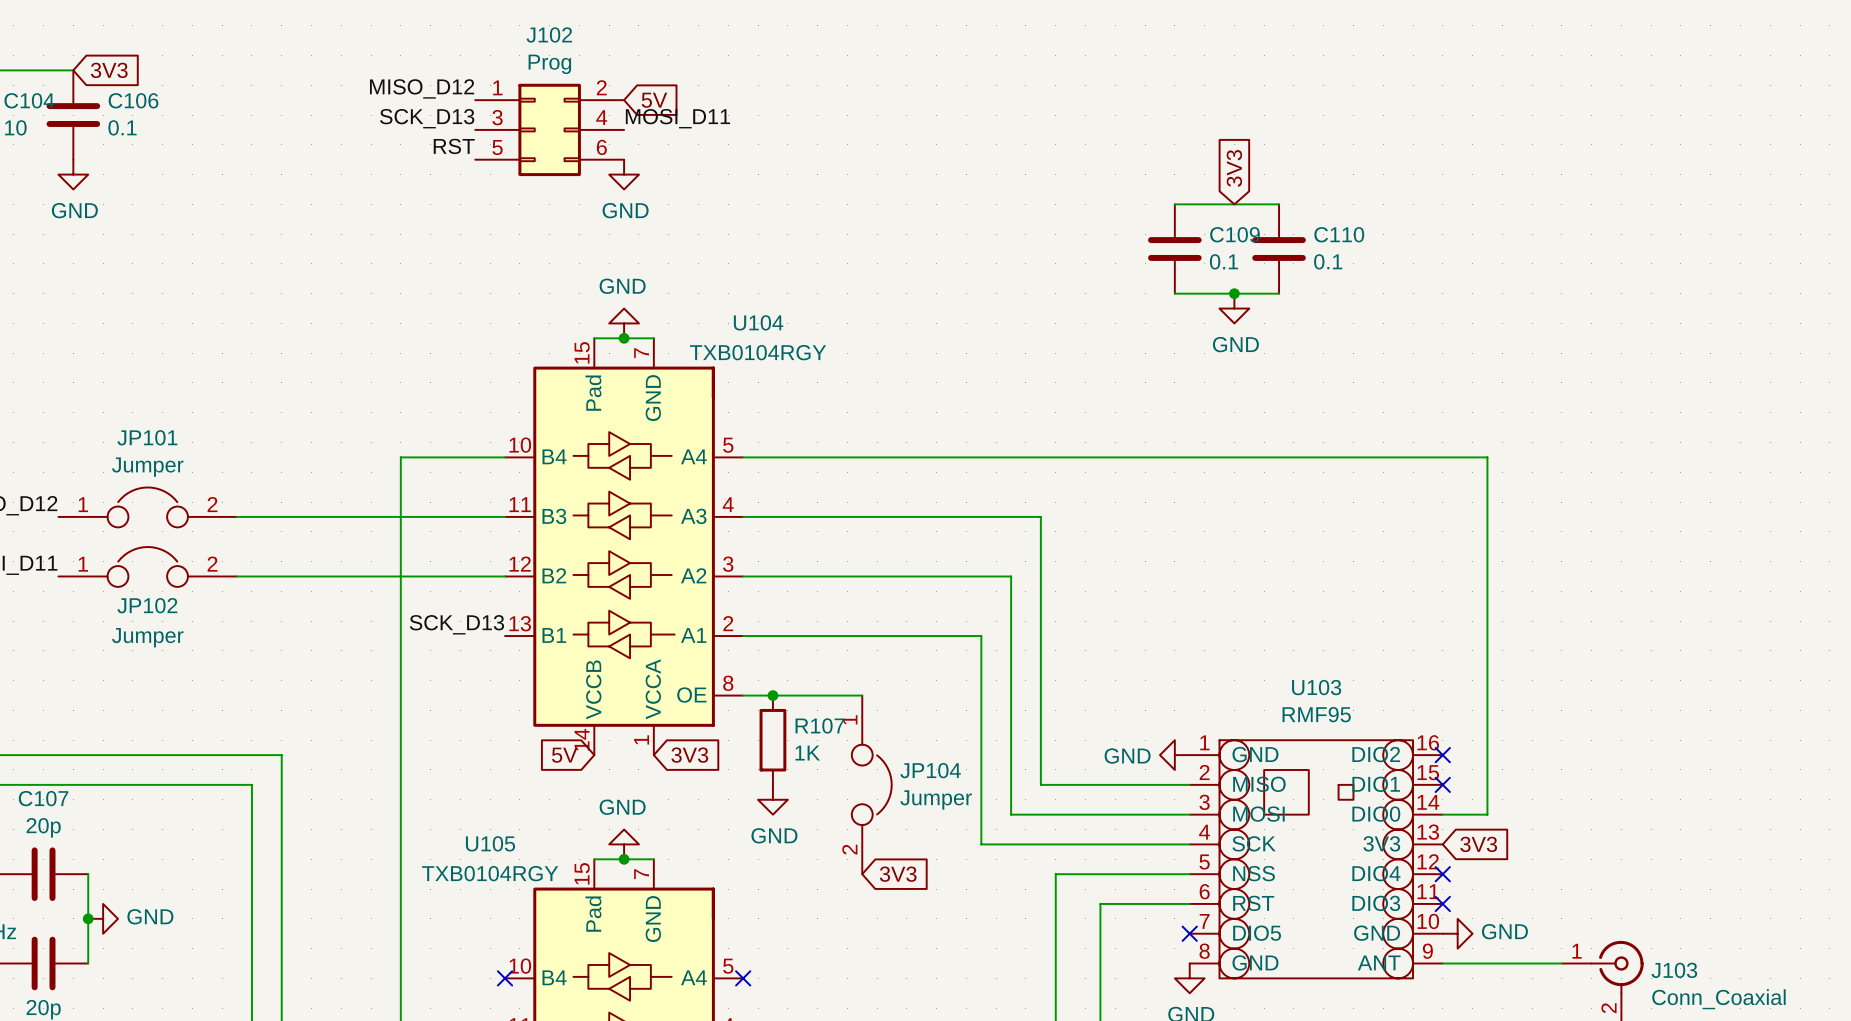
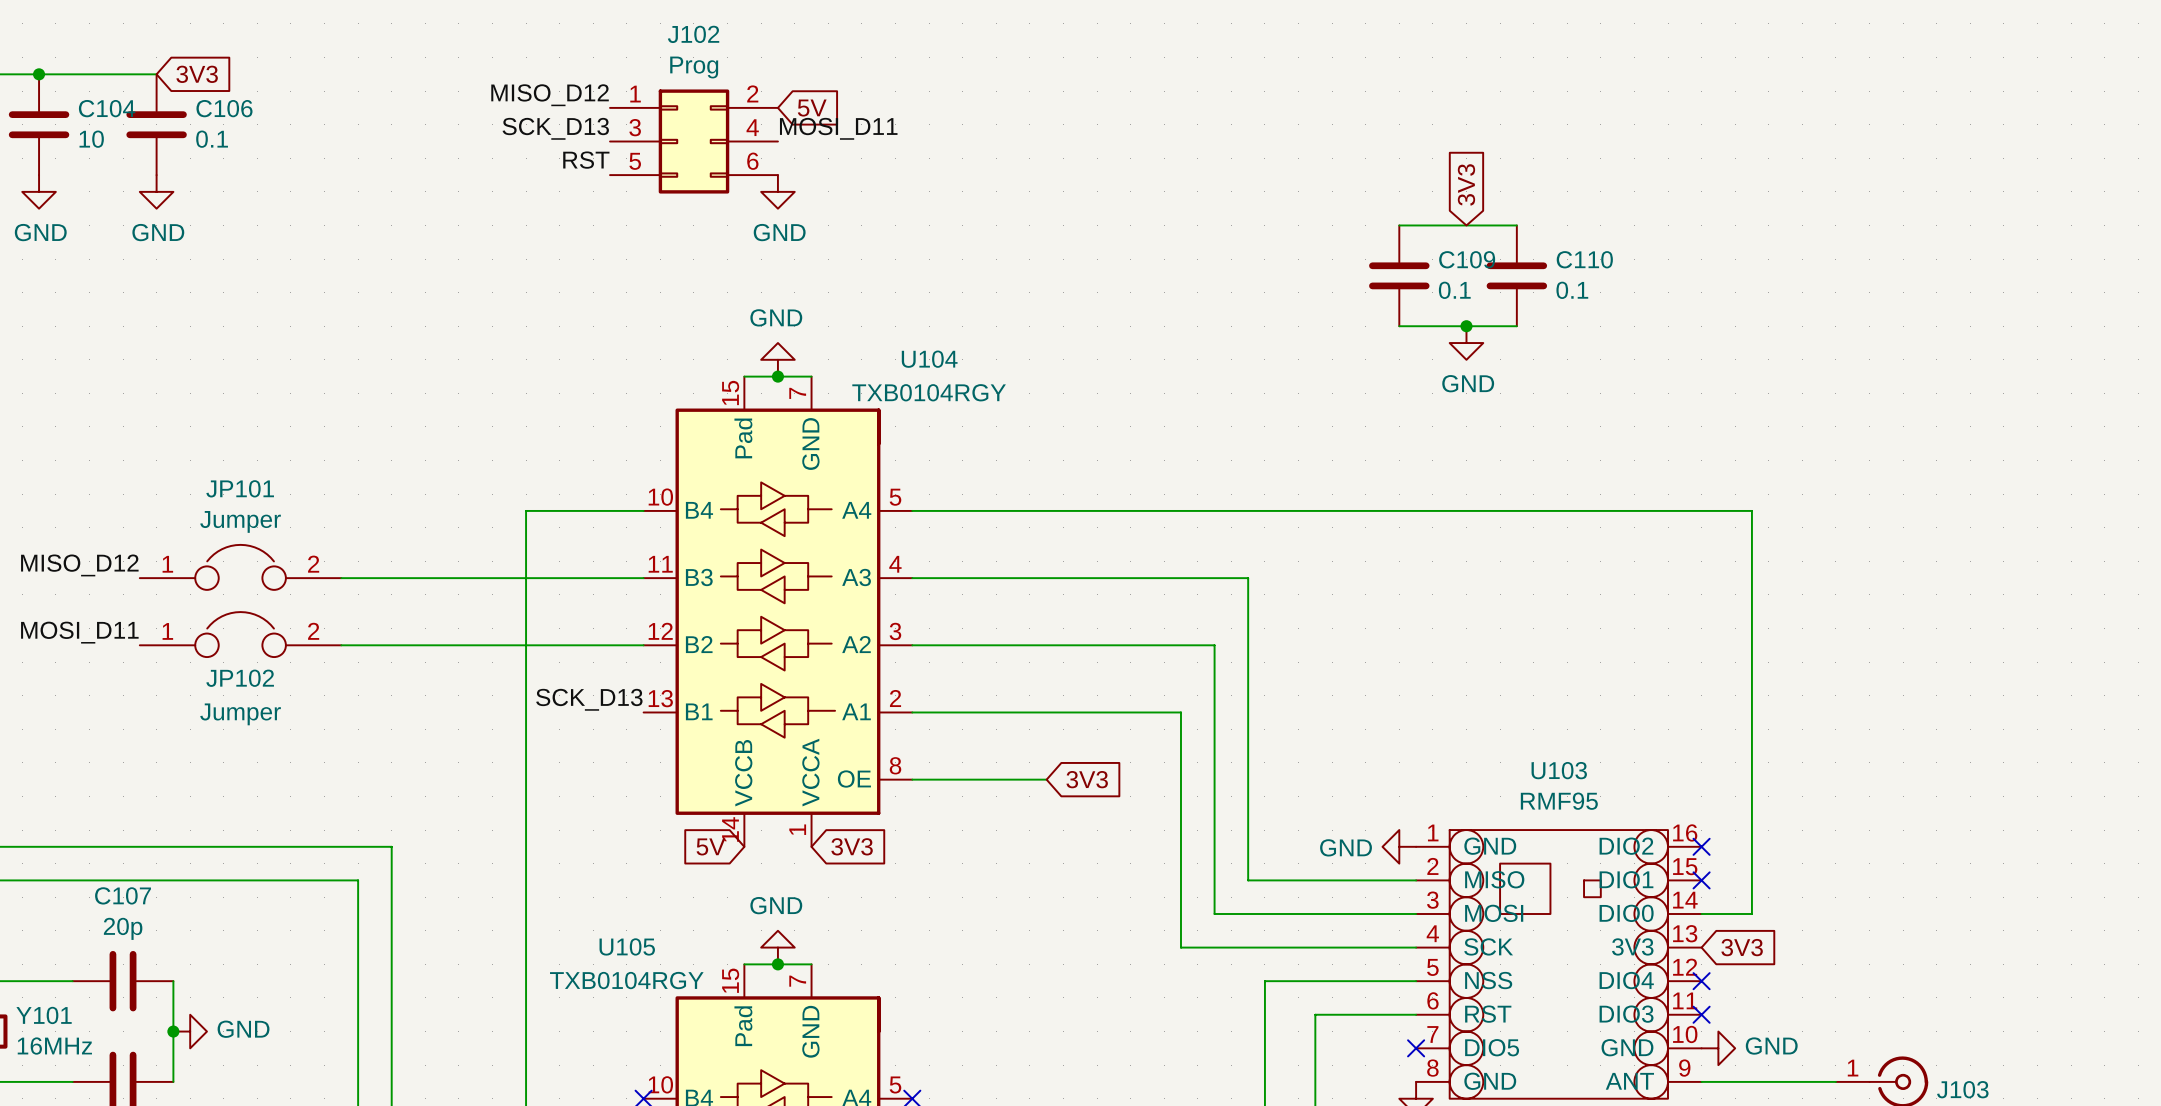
junction: (772, 695) -> none
R107: 1K (772, 740) -> none
JP104: Jumper (871, 784) -> none
power symbol: GND (772, 799) -> none
global label position: 3V3 (898, 874) -> 3V3 (1087, 779)

